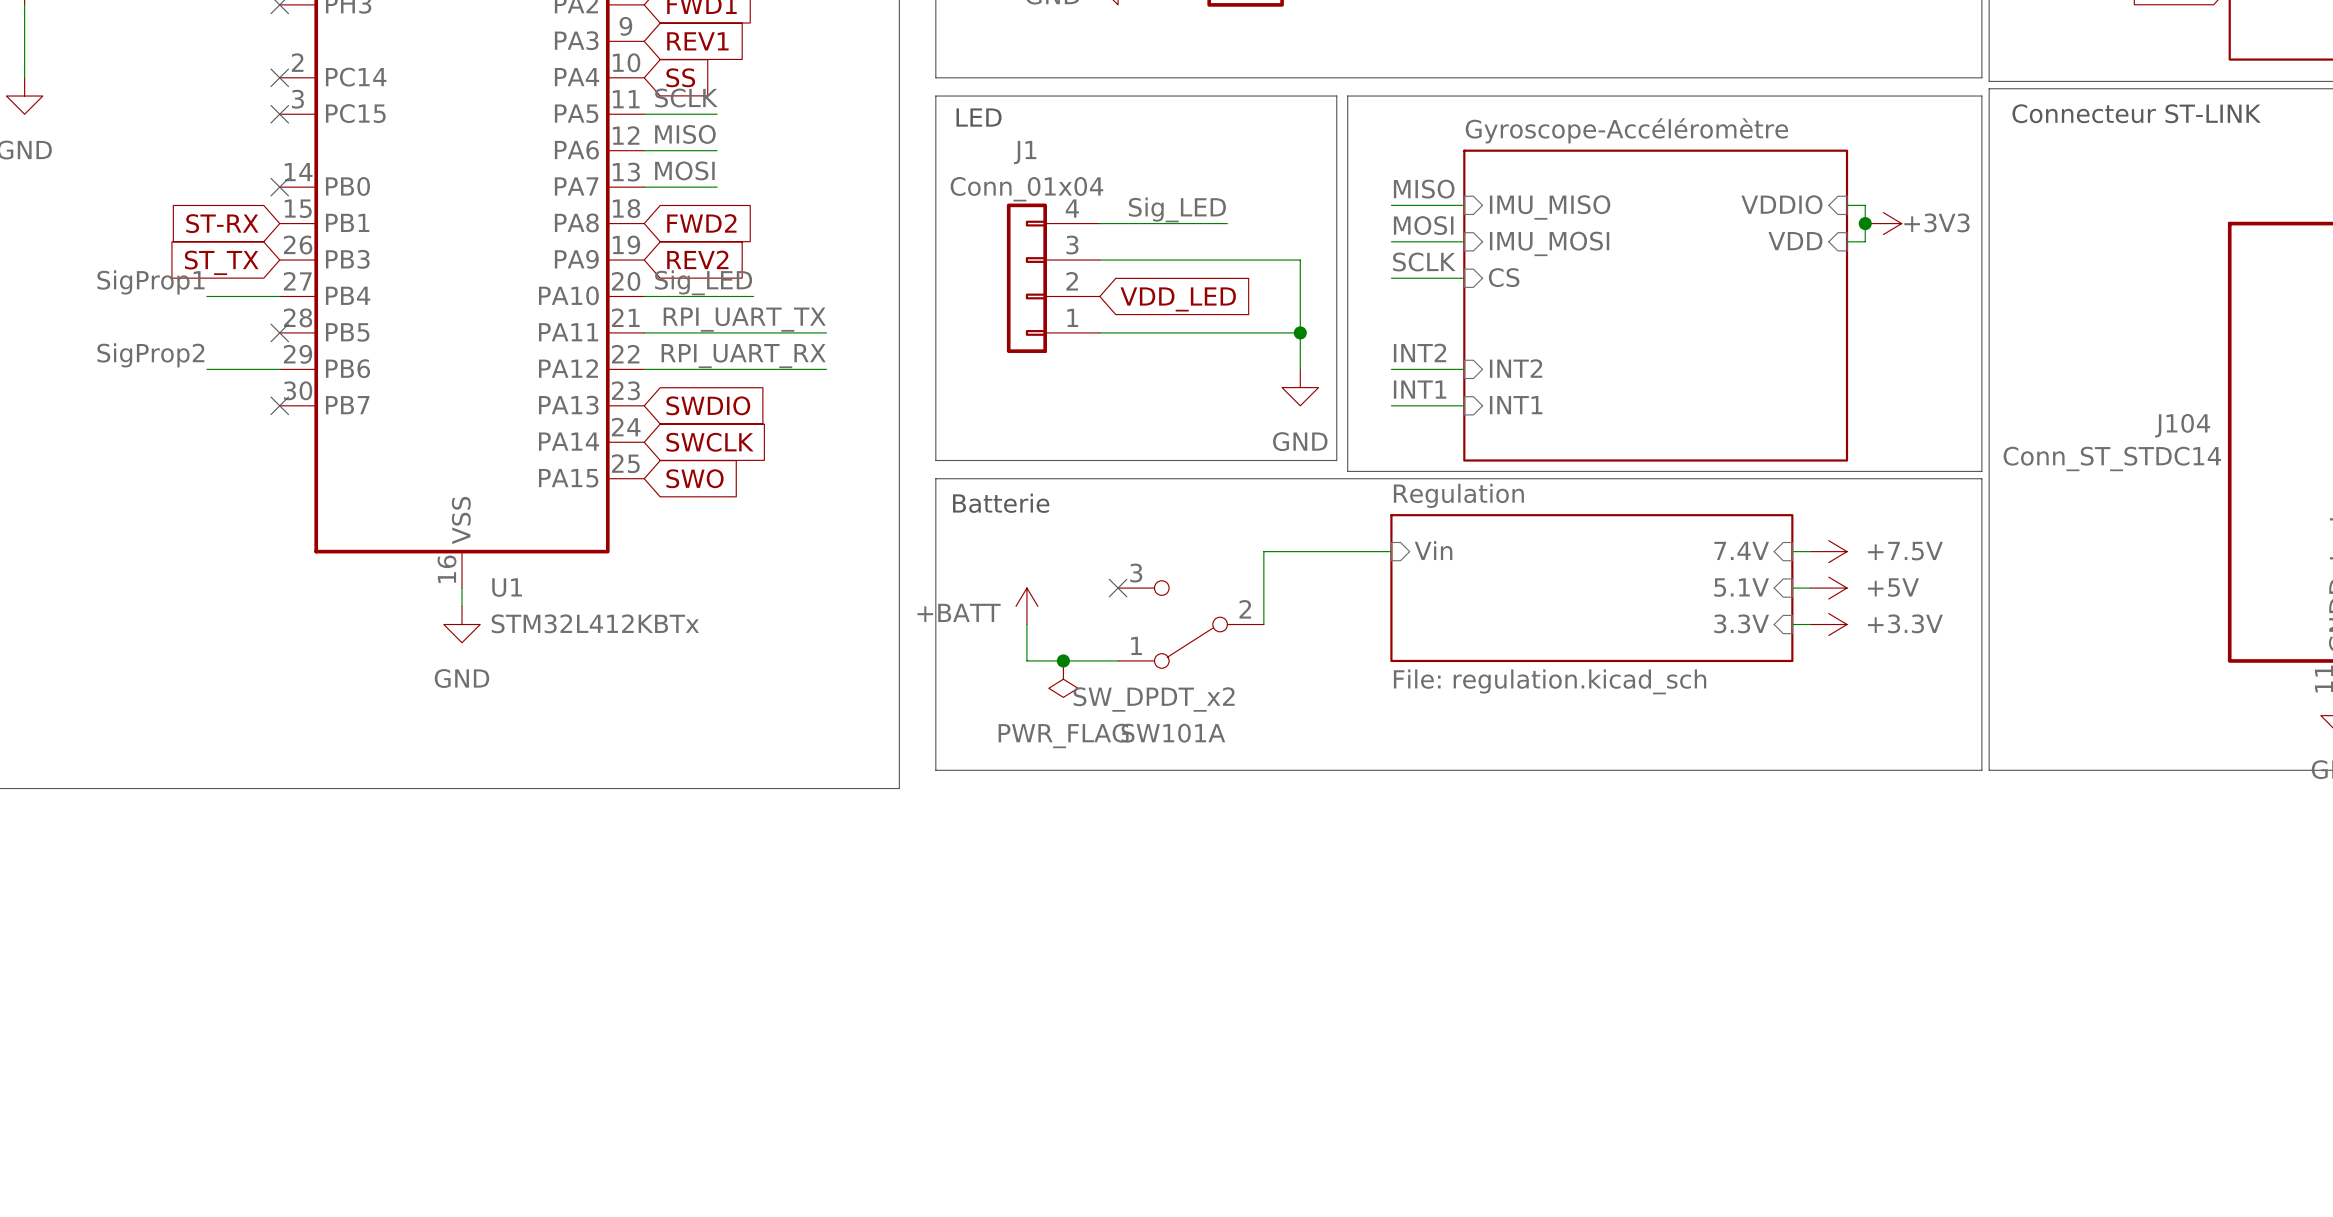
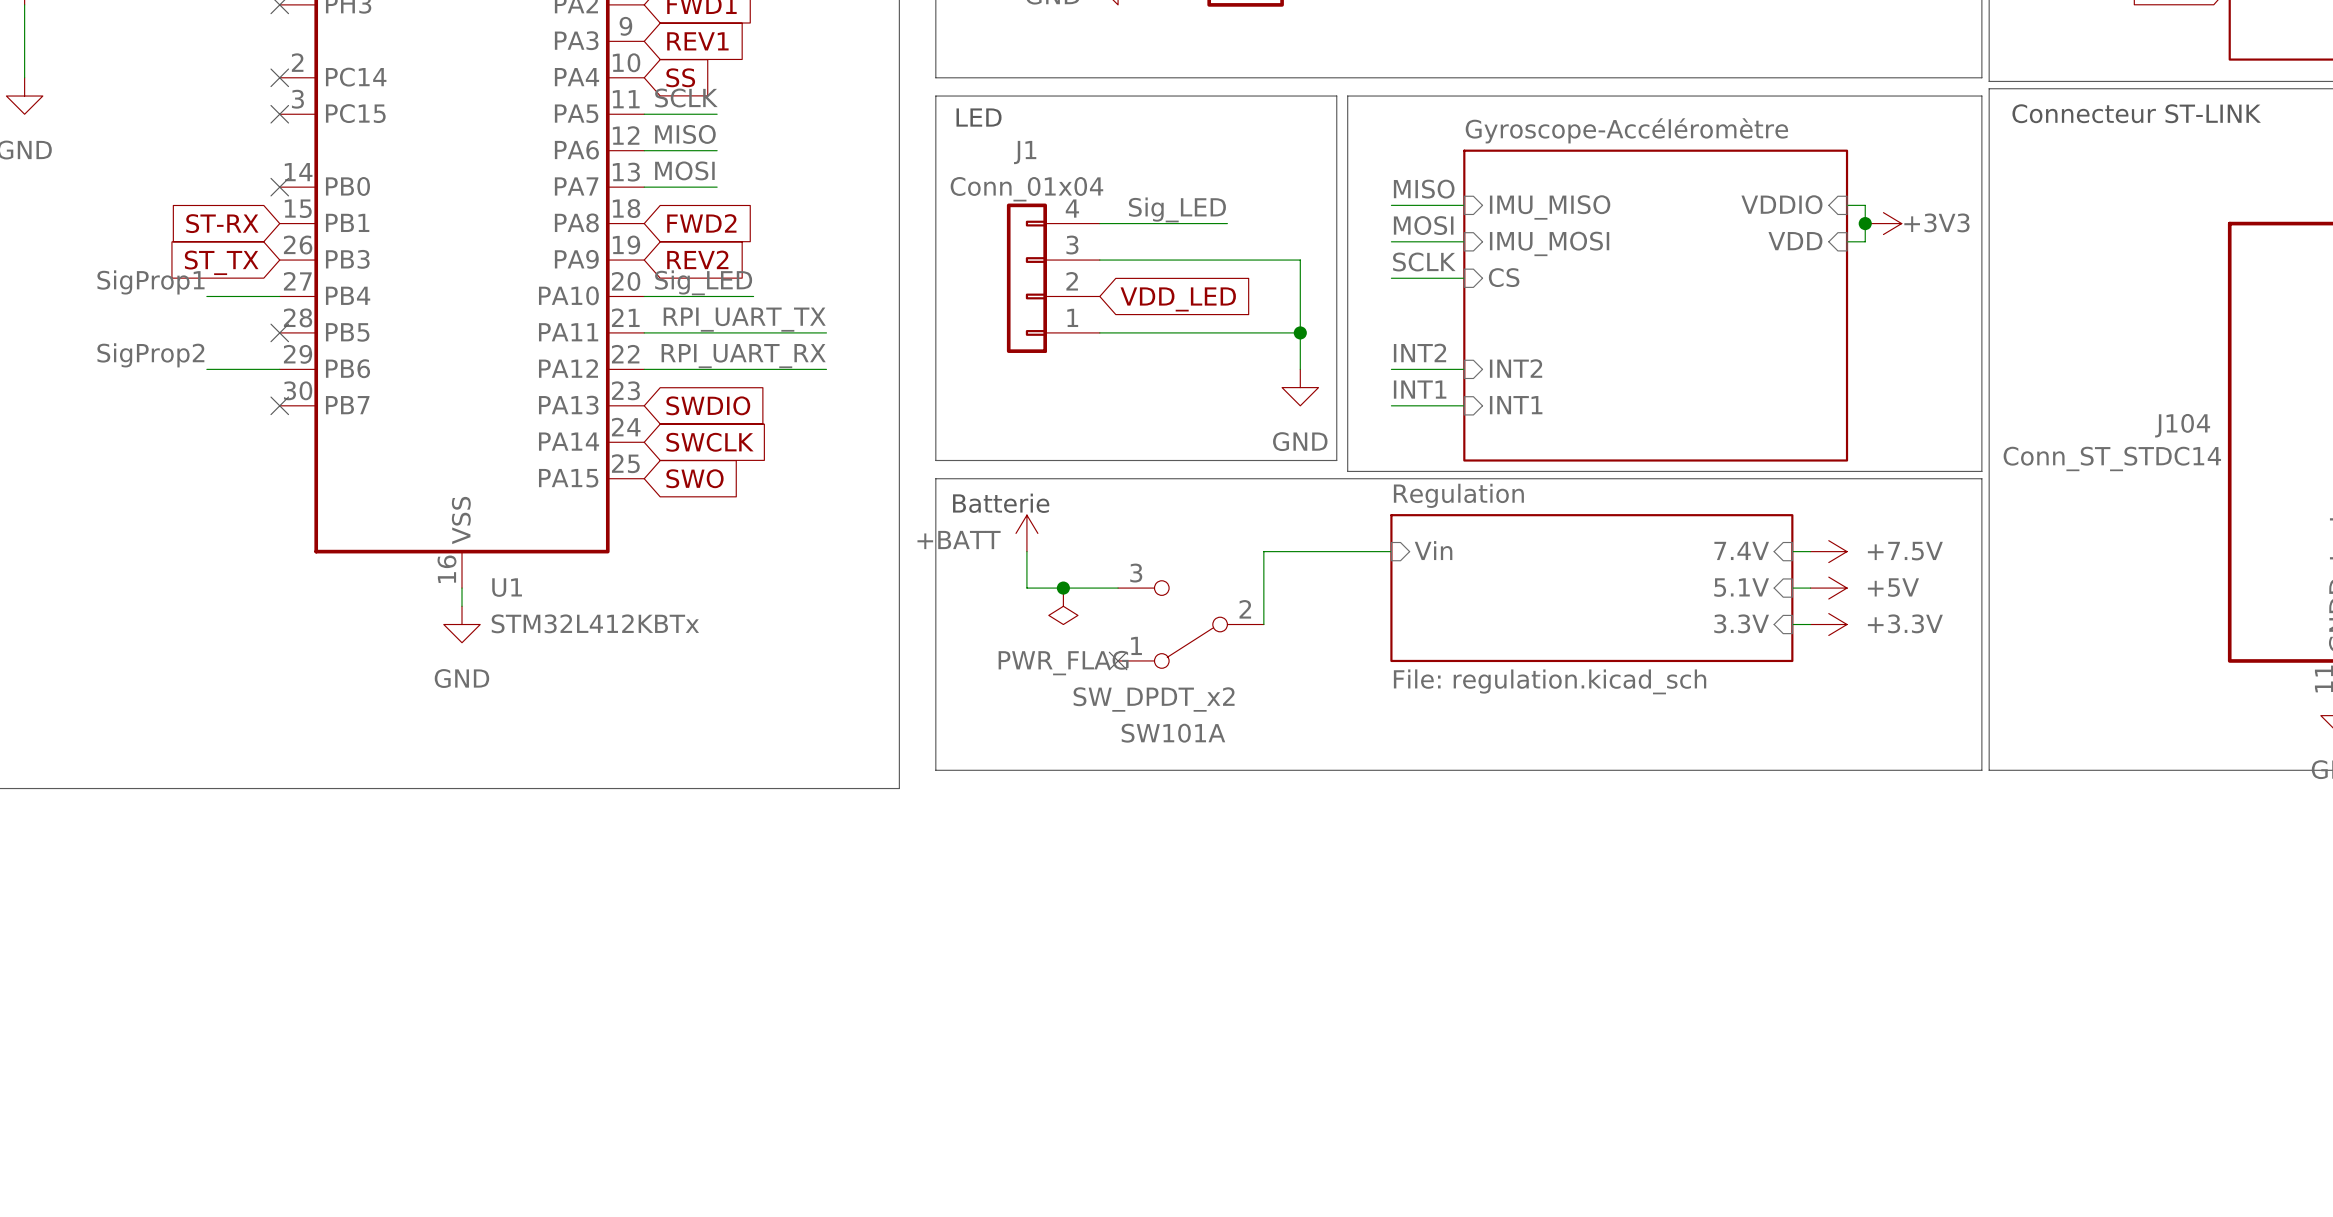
no-connect mark position: (1118, 588) -> (1118, 660)
power symbol position: +BATT (1026, 606) -> +BATT (1026, 533)
wire: (1026, 624) (1026, 660) (1118, 660) -> (1026, 551) (1026, 588) (1118, 588)
junction position: (1063, 660) -> (1063, 588)
power symbol position: PWR_FLAG (1063, 679) -> PWR_FLAG (1063, 606)

